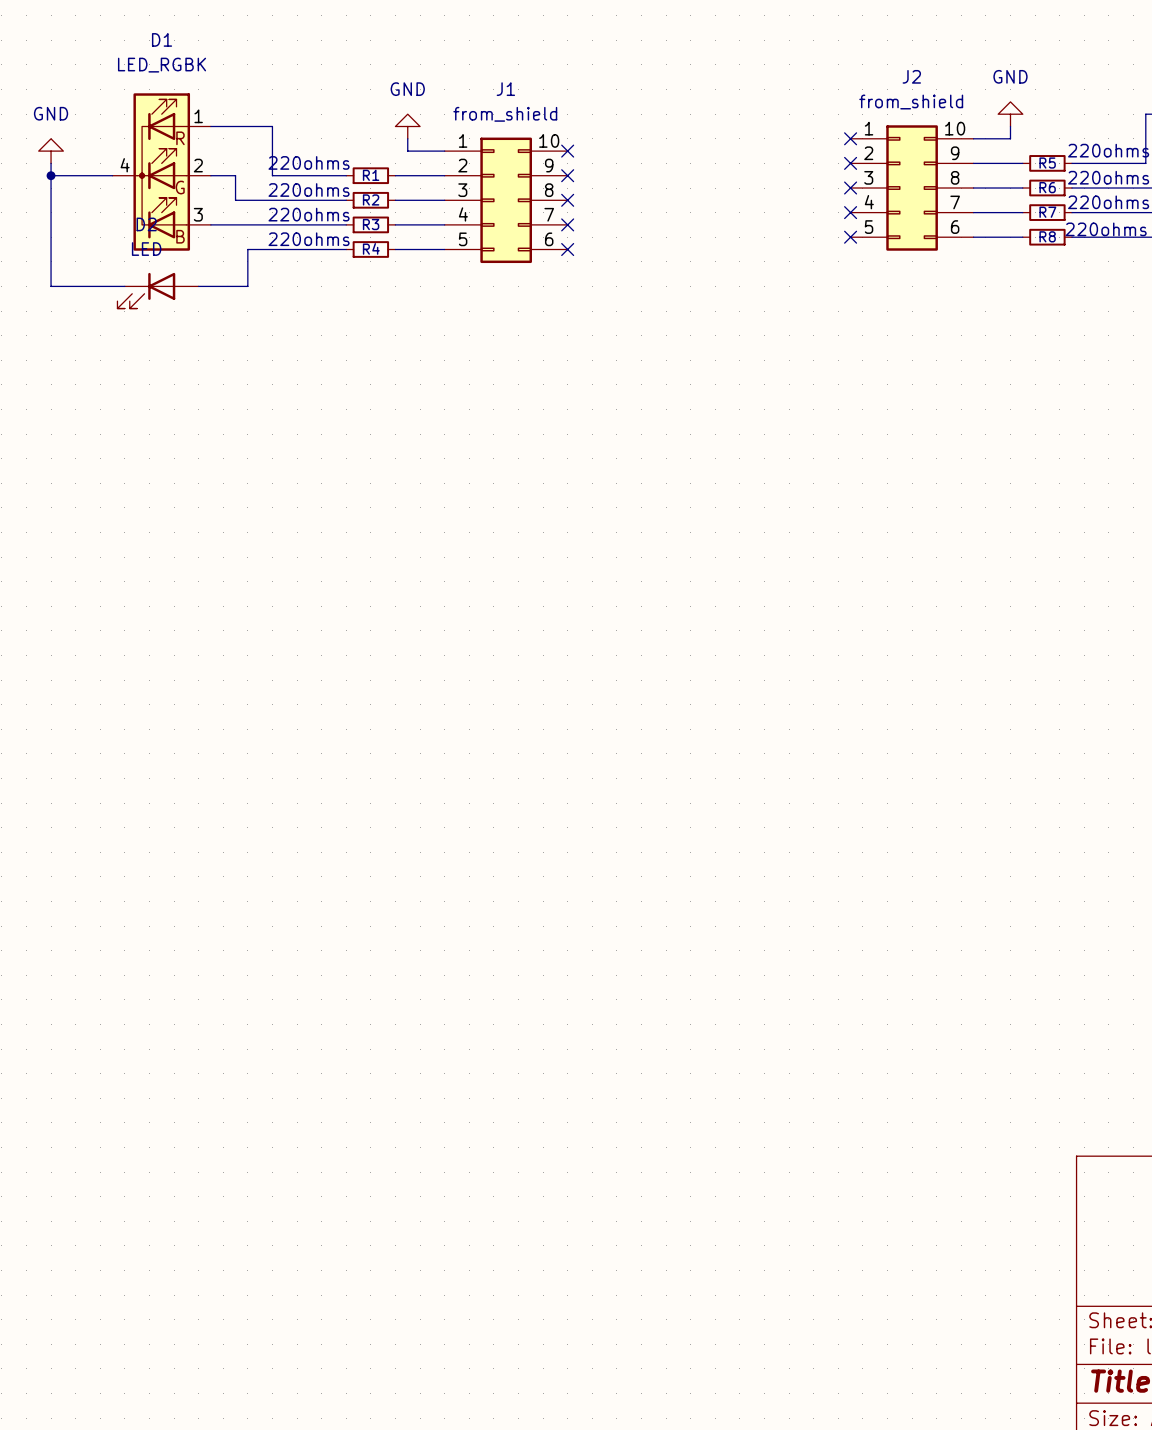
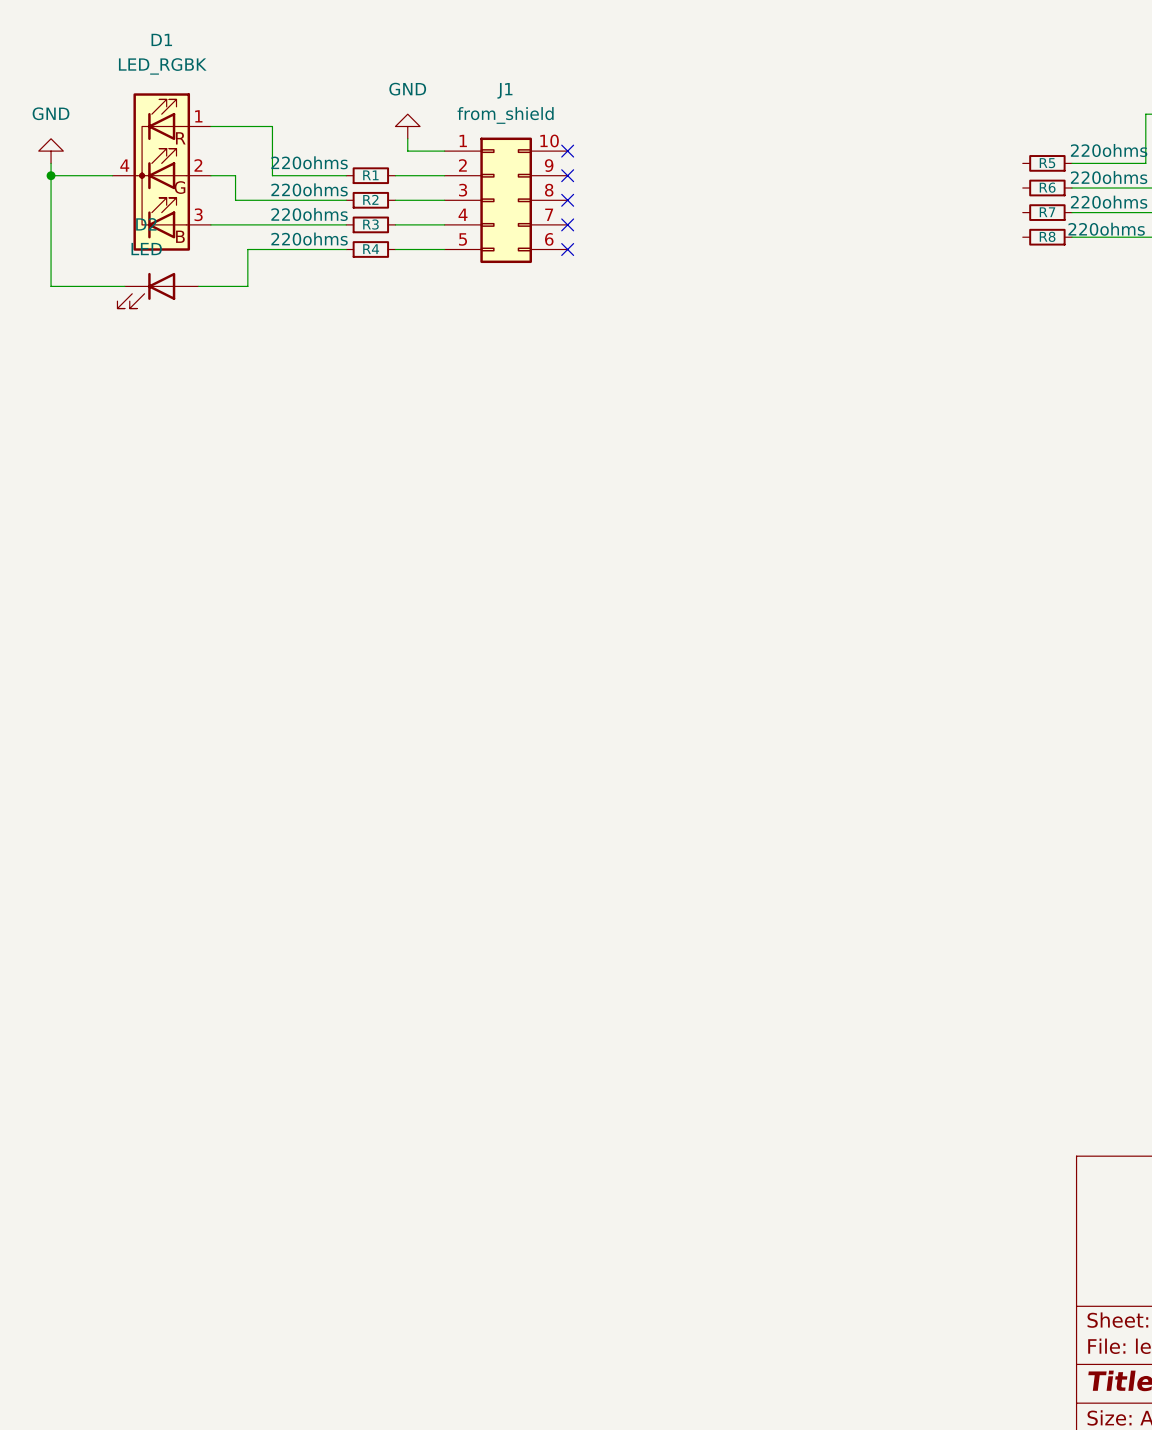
power symbol: GND (1010, 114) -> none
wire: (1010, 126) (1010, 138) (973, 138) -> none
no-connect mark: (850, 138) -> none
no-connect mark: (850, 163) -> none
wire: (973, 163) (1022, 163) -> none
no-connect mark: (850, 188) -> none
J2: from_shield (912, 188) -> none
wire: (973, 188) (1022, 188) -> none
no-connect mark: (850, 212) -> none
wire: (973, 212) (1022, 212) -> none
no-connect mark: (850, 237) -> none
wire: (973, 237) (1022, 237) -> none

